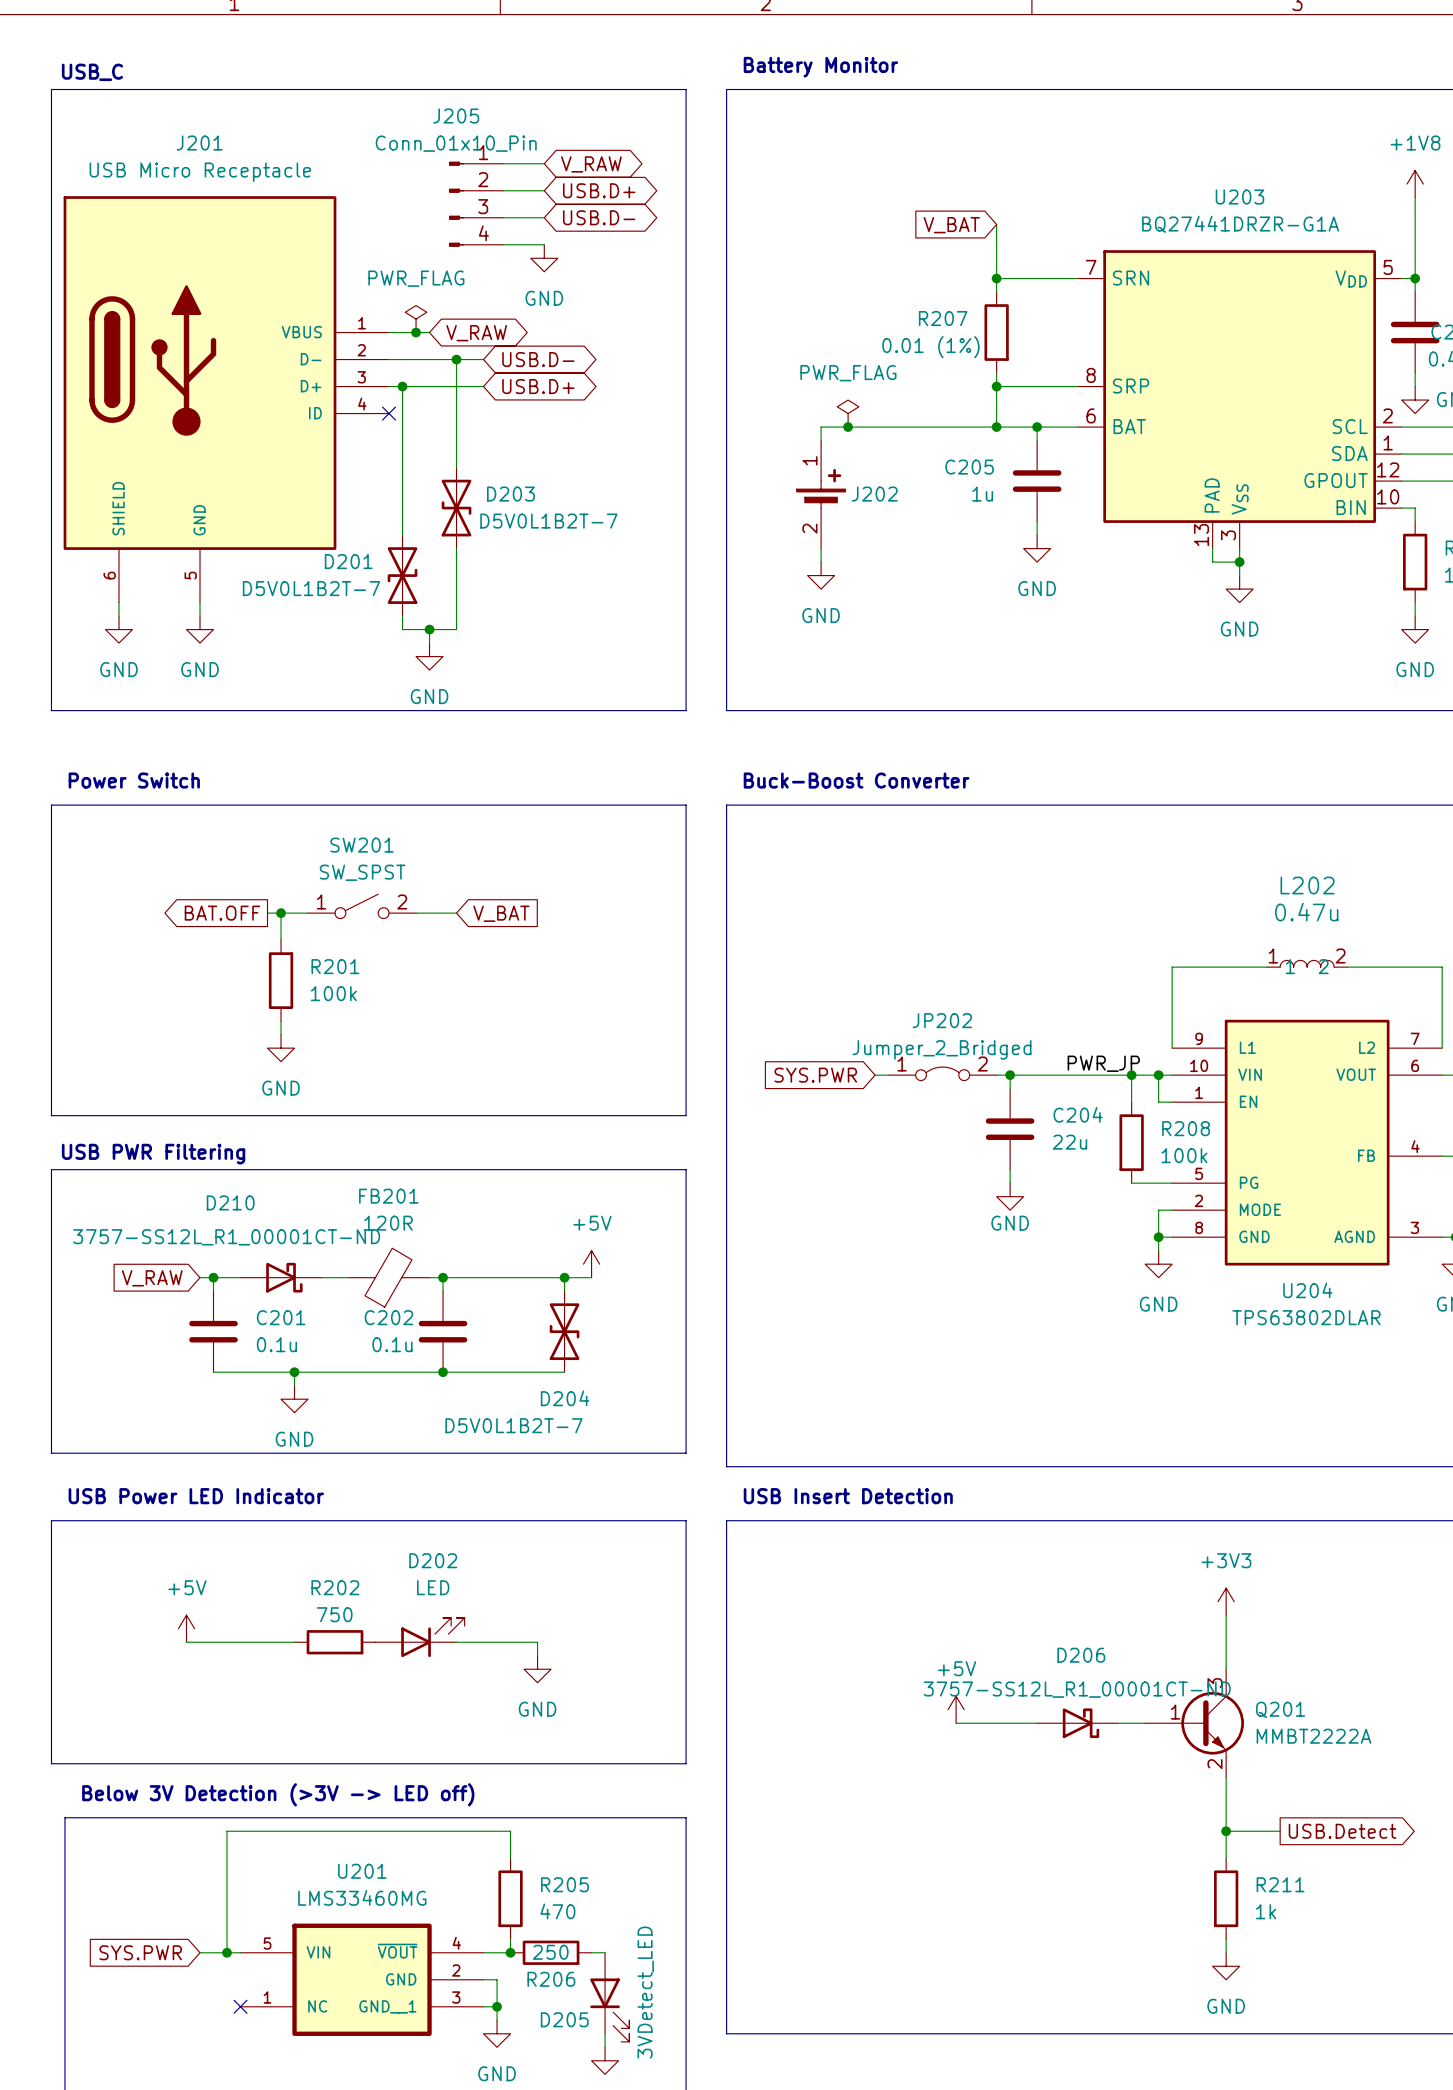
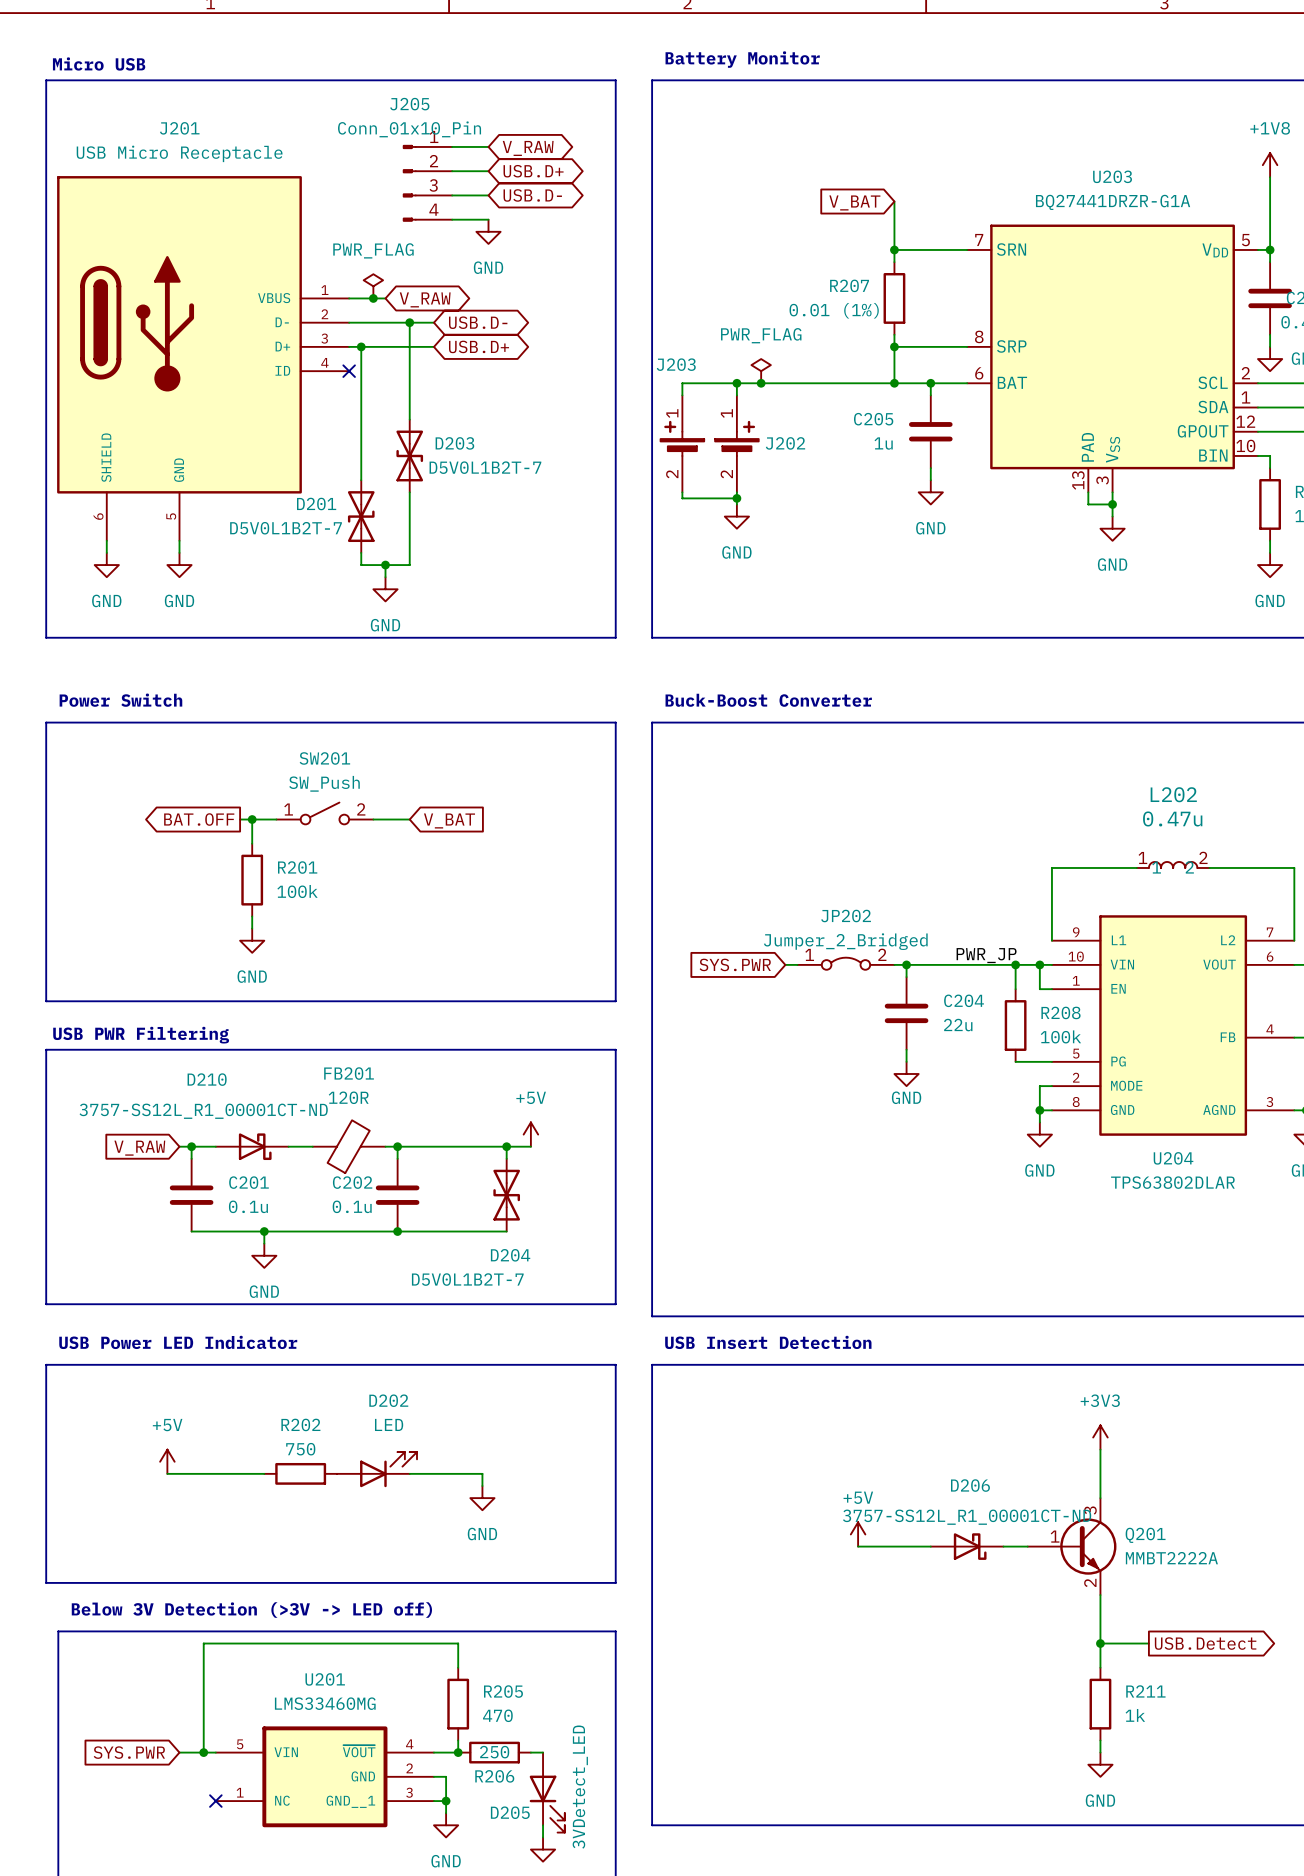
text: USB_C (92, 72) -> Micro USB (99, 63)
wire: none -> (736, 383) (682, 383) (682, 395)
junction: none -> (736, 383)
J203: none -> (682, 443)
wire: none -> (682, 492) (682, 498) (736, 498)
junction: none -> (736, 498)
SW201 value: SW_SPST (362, 872) -> SW_Push (324, 783)

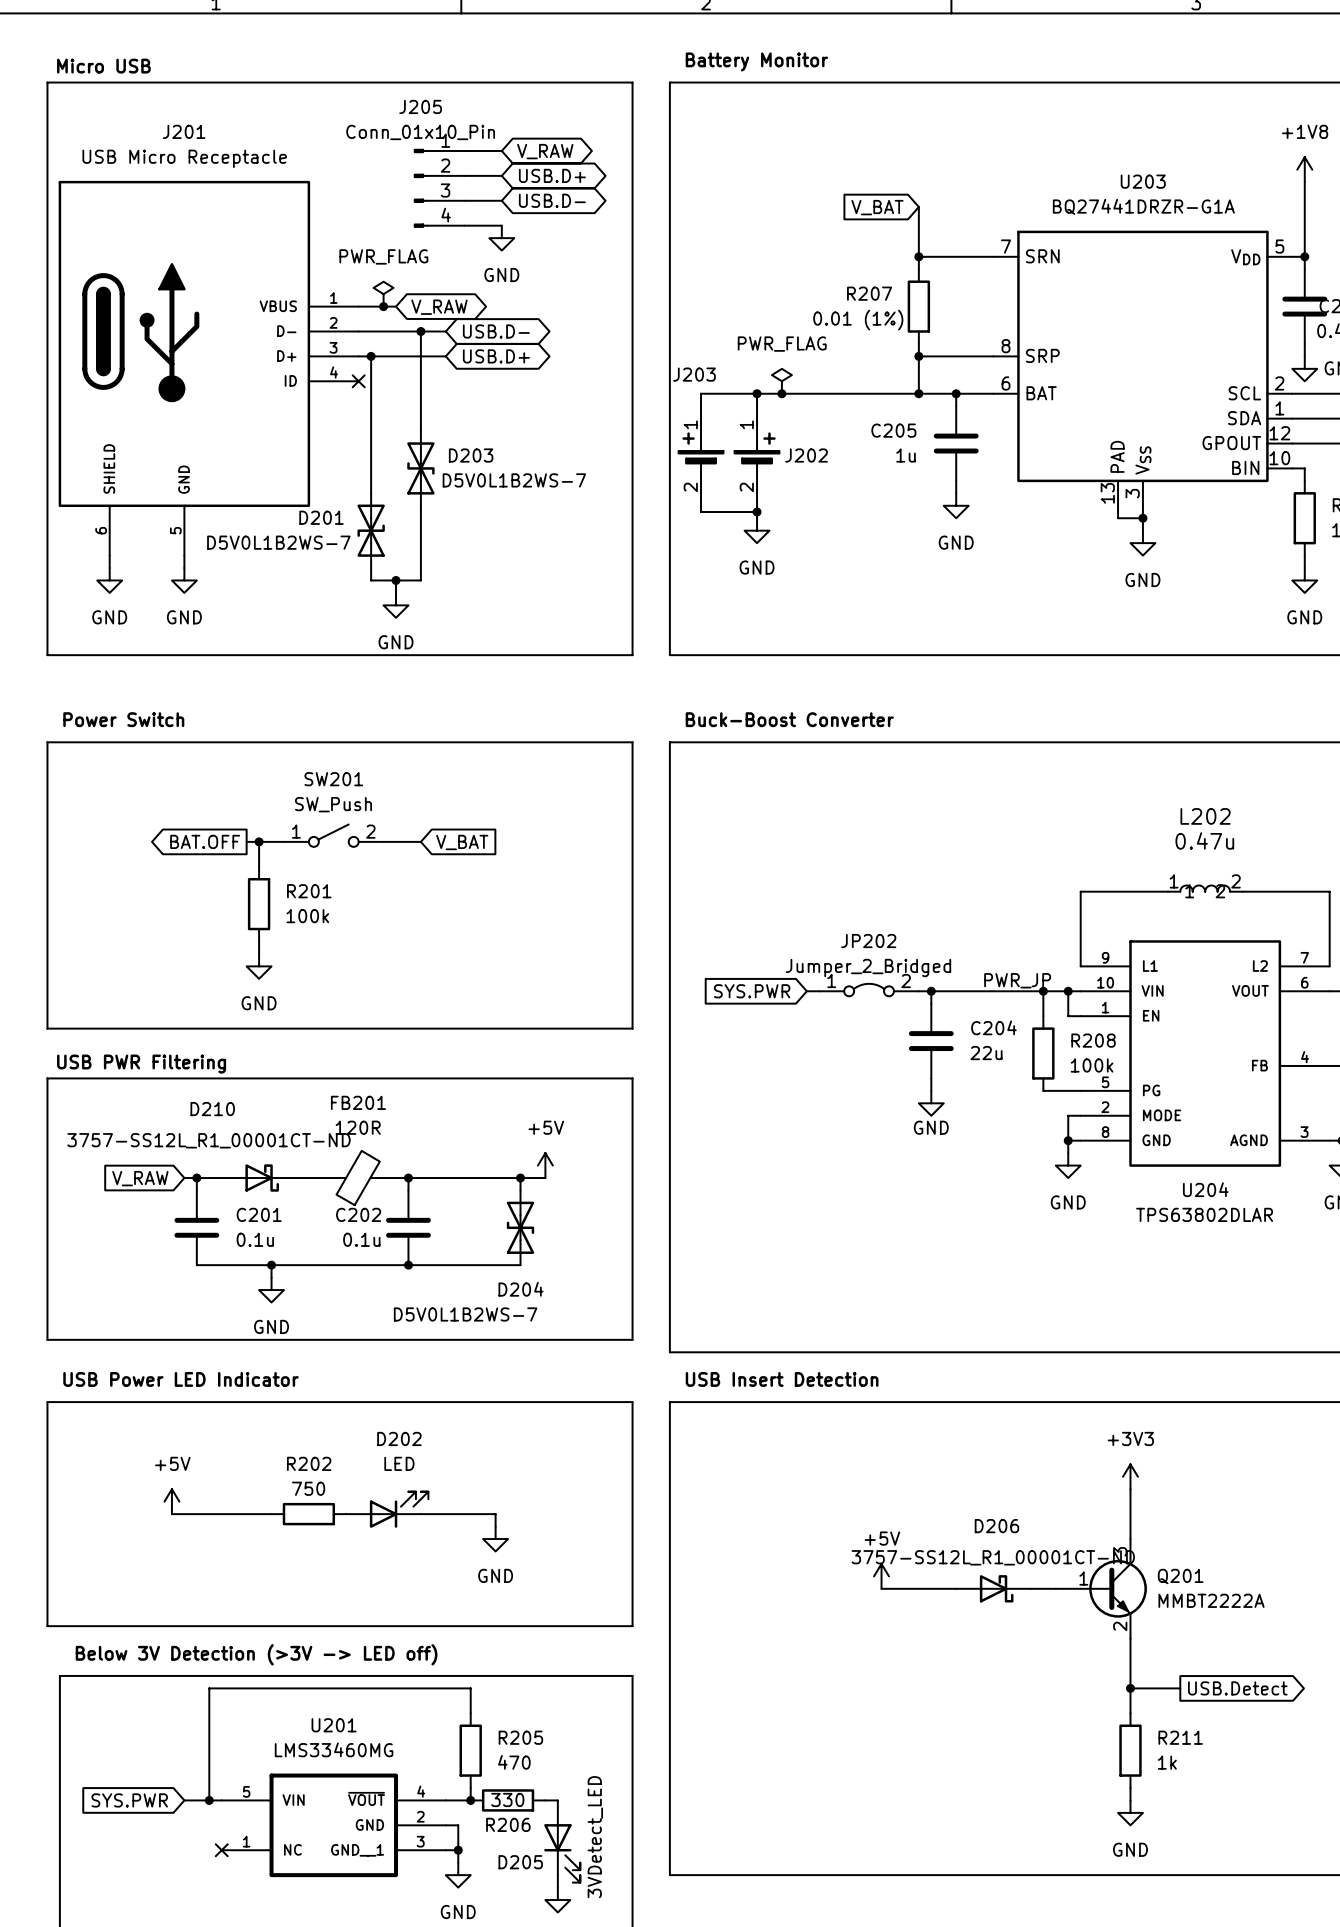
D203 value: D5V0L1B2T-7 (485, 467) -> D5V0L1B2WS-7 (514, 480)
D201 value: D5V0L1B2T-7 (286, 528) -> D5V0L1B2WS-7 (278, 542)
D204 value: D5V0L1B2T-7 (467, 1279) -> D5V0L1B2WS-7 (465, 1314)
R206 value: 250 (494, 1752) -> 330 (507, 1799)

